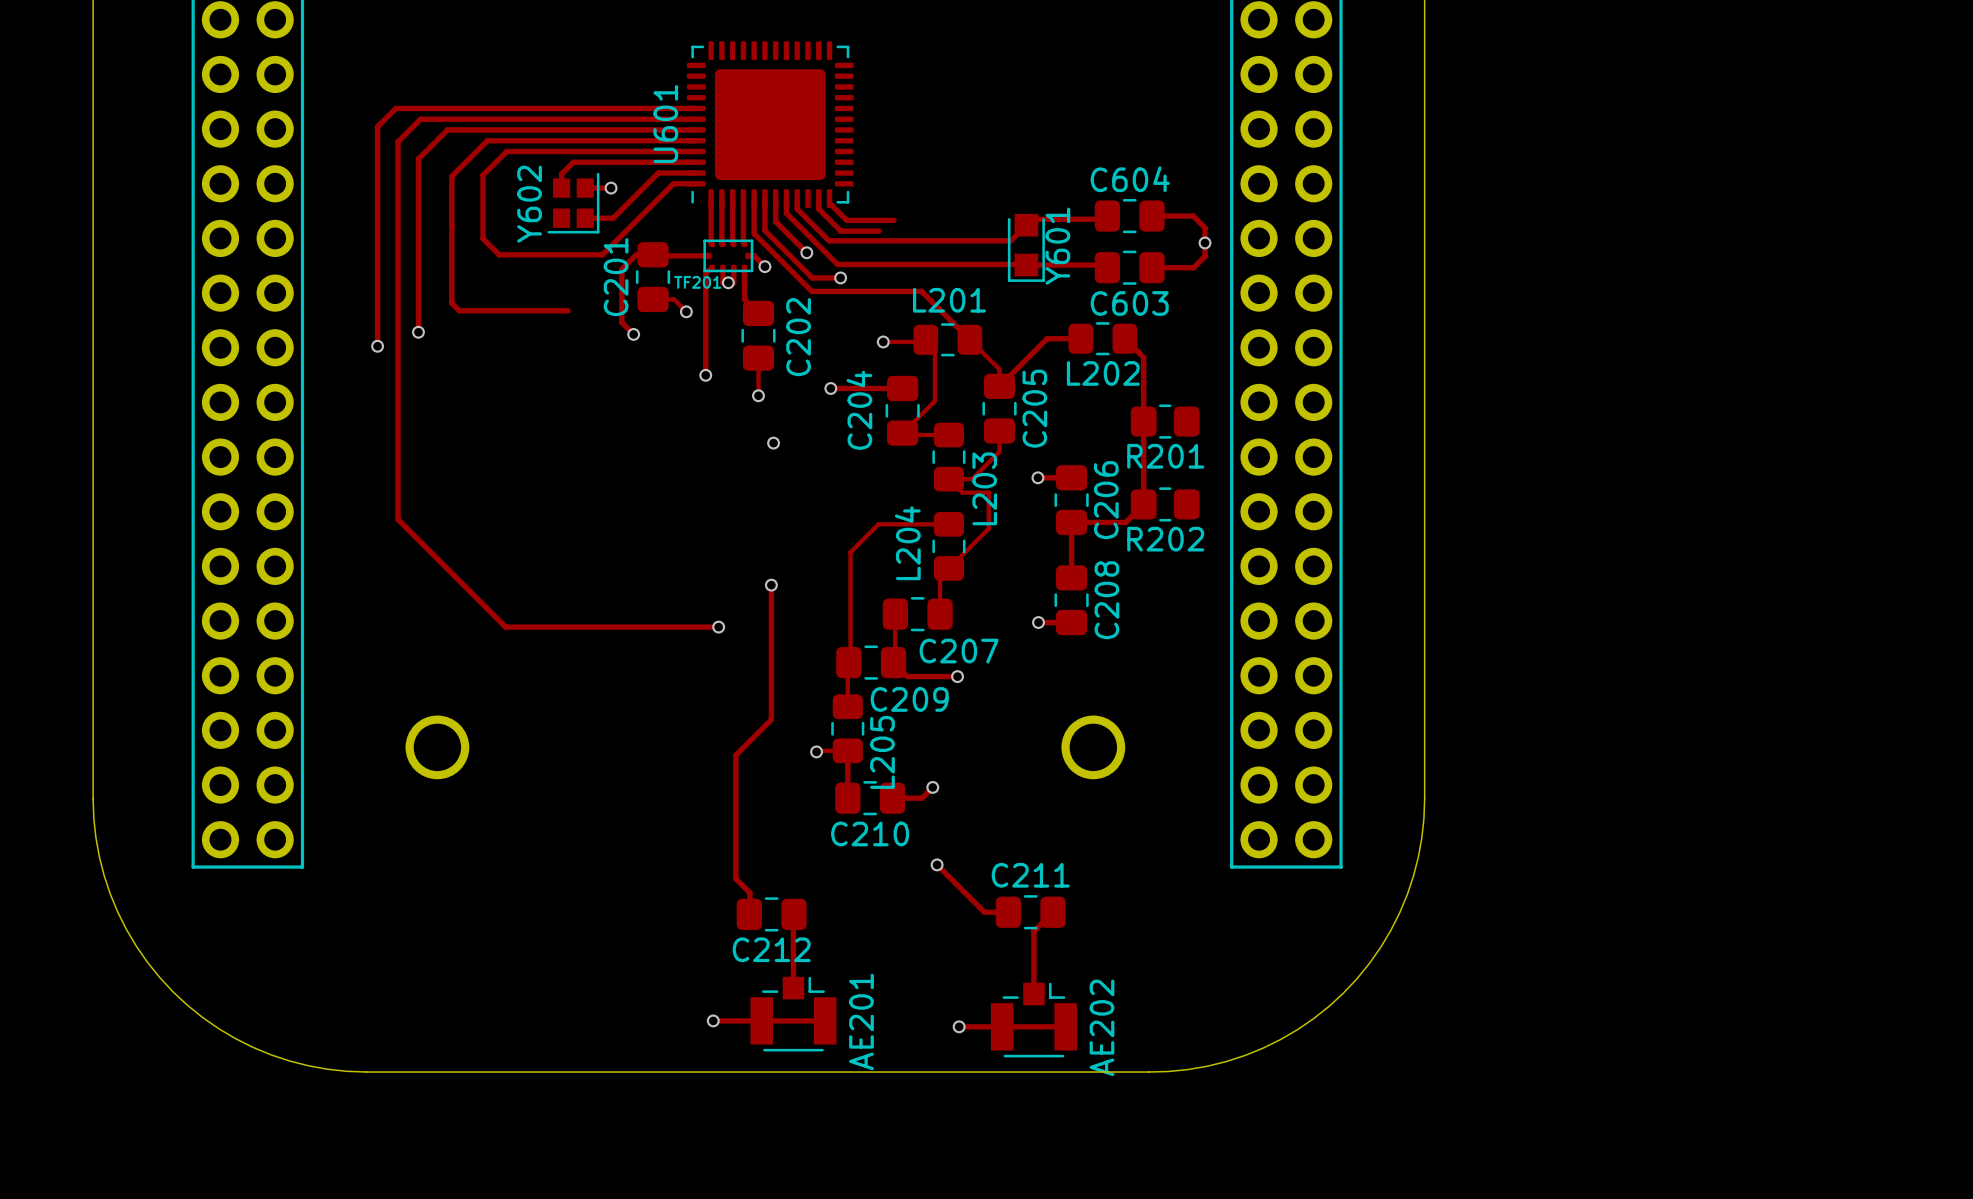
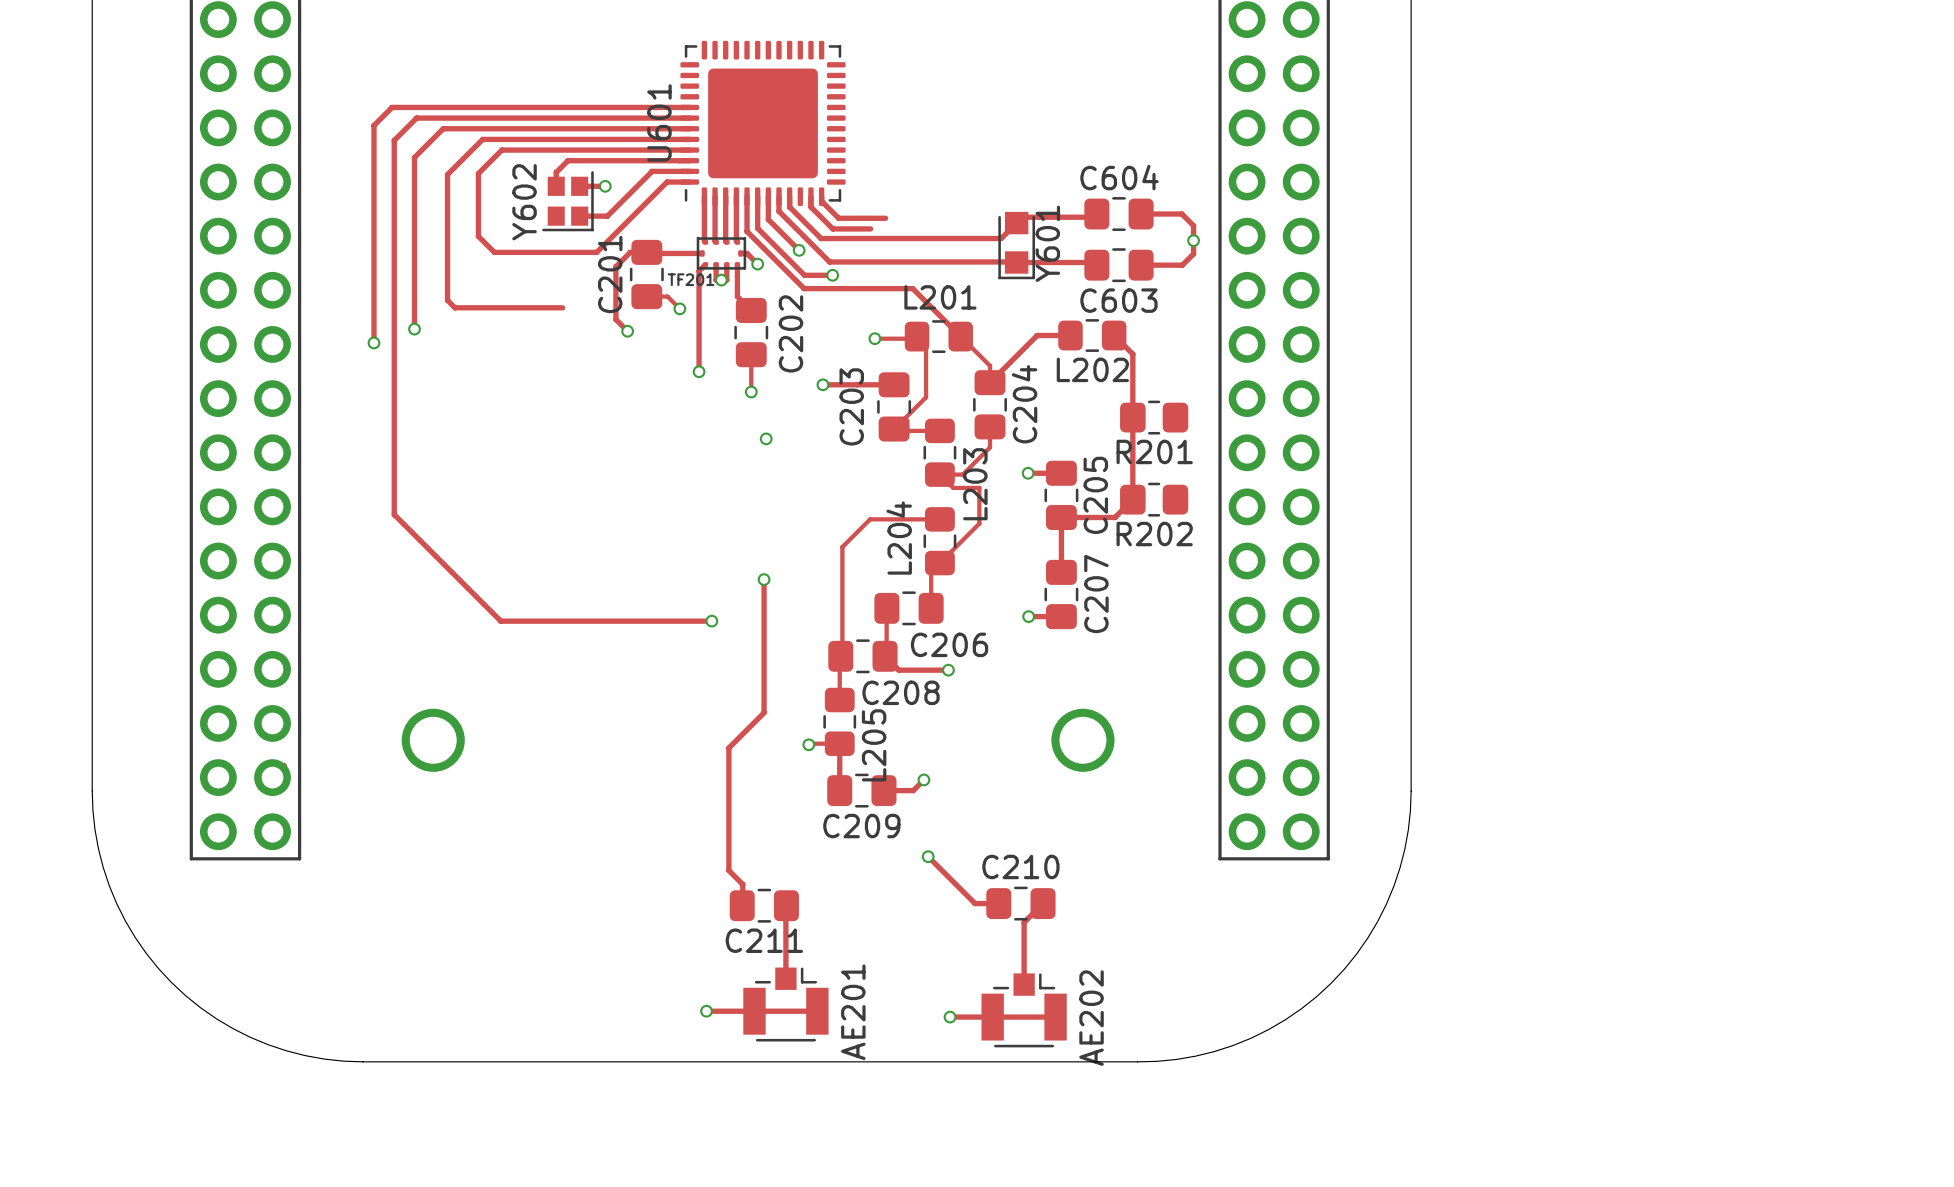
C205 name: C205 (1034, 408) -> C204 (1024, 404)
C204 name: C204 (859, 410) -> C203 (851, 406)
C206 name: C206 (1106, 500) -> C205 (1095, 495)
C208 name: C208 (1106, 600) -> C207 (1096, 593)
C207 name: C207 (959, 651) -> C206 (949, 644)
C209 name: C209 (909, 699) -> C208 (901, 692)
C210 name: C210 (870, 833) -> C209 (861, 826)
C211 name: C211 (1030, 875) -> C210 (1020, 866)
C212 name: C212 (771, 949) -> C211 (764, 940)

